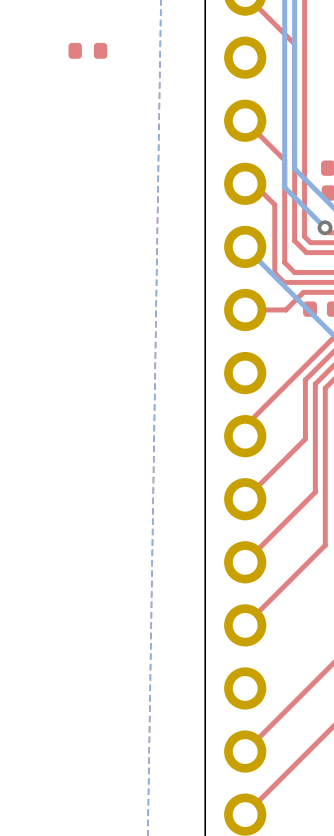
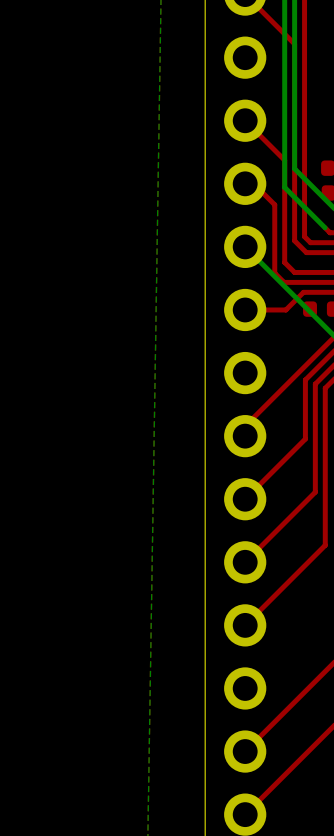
part: (87, 50) -> none
via: (325, 227) -> none

